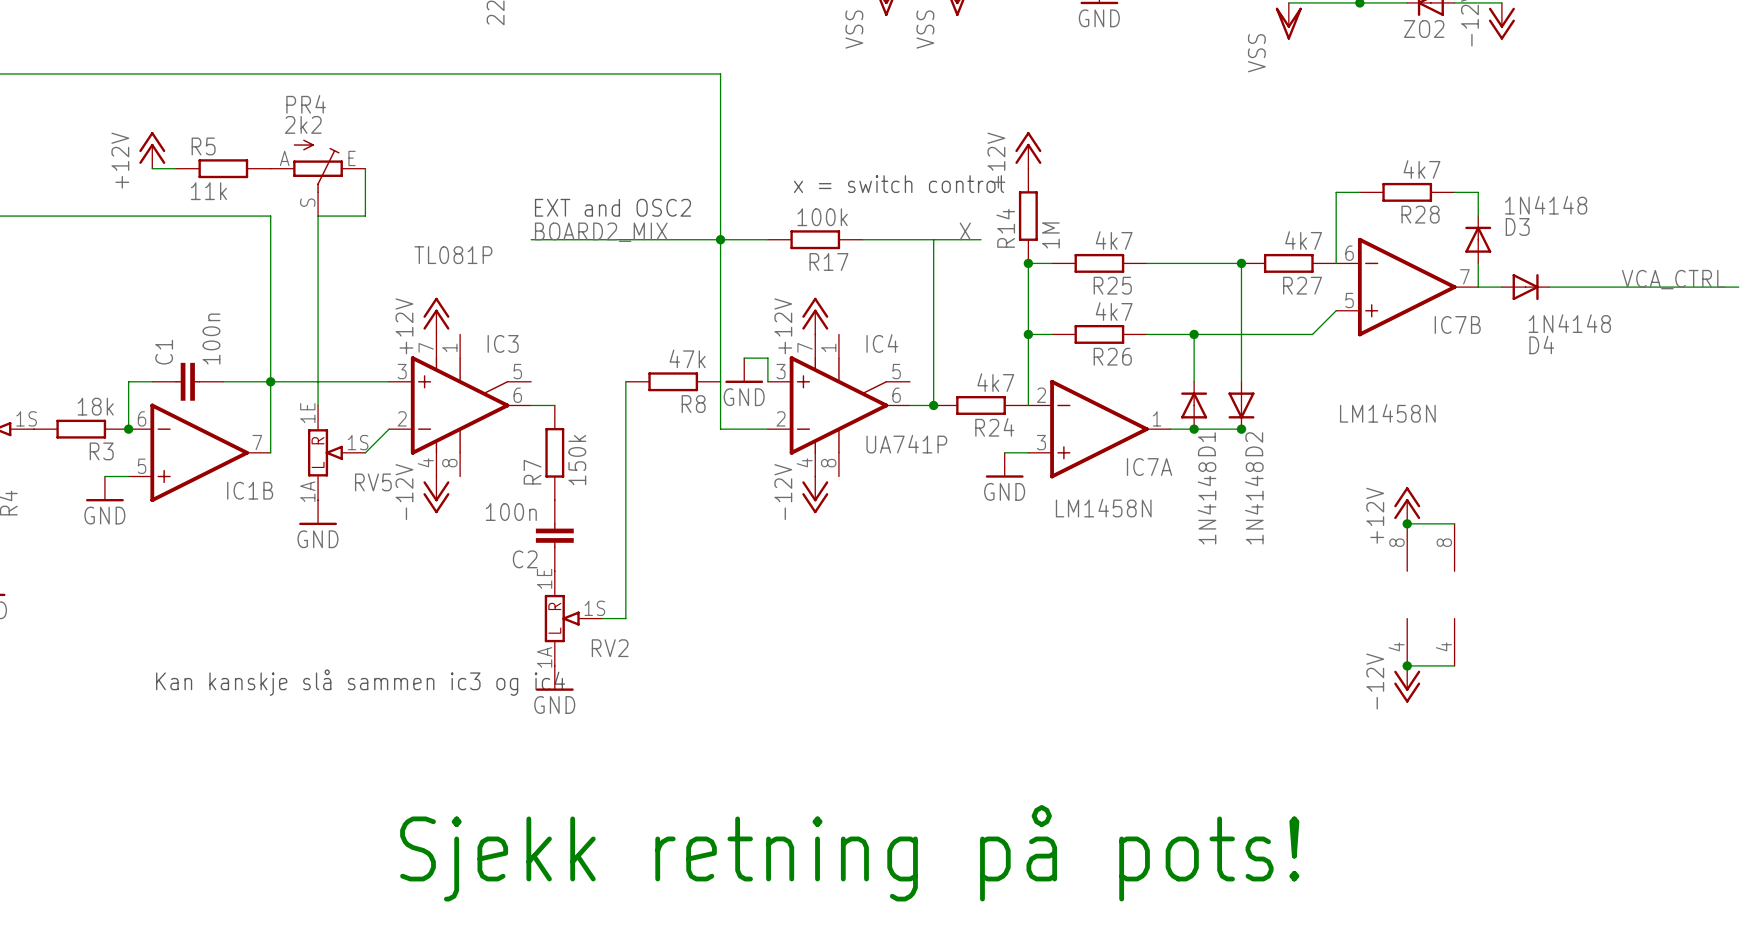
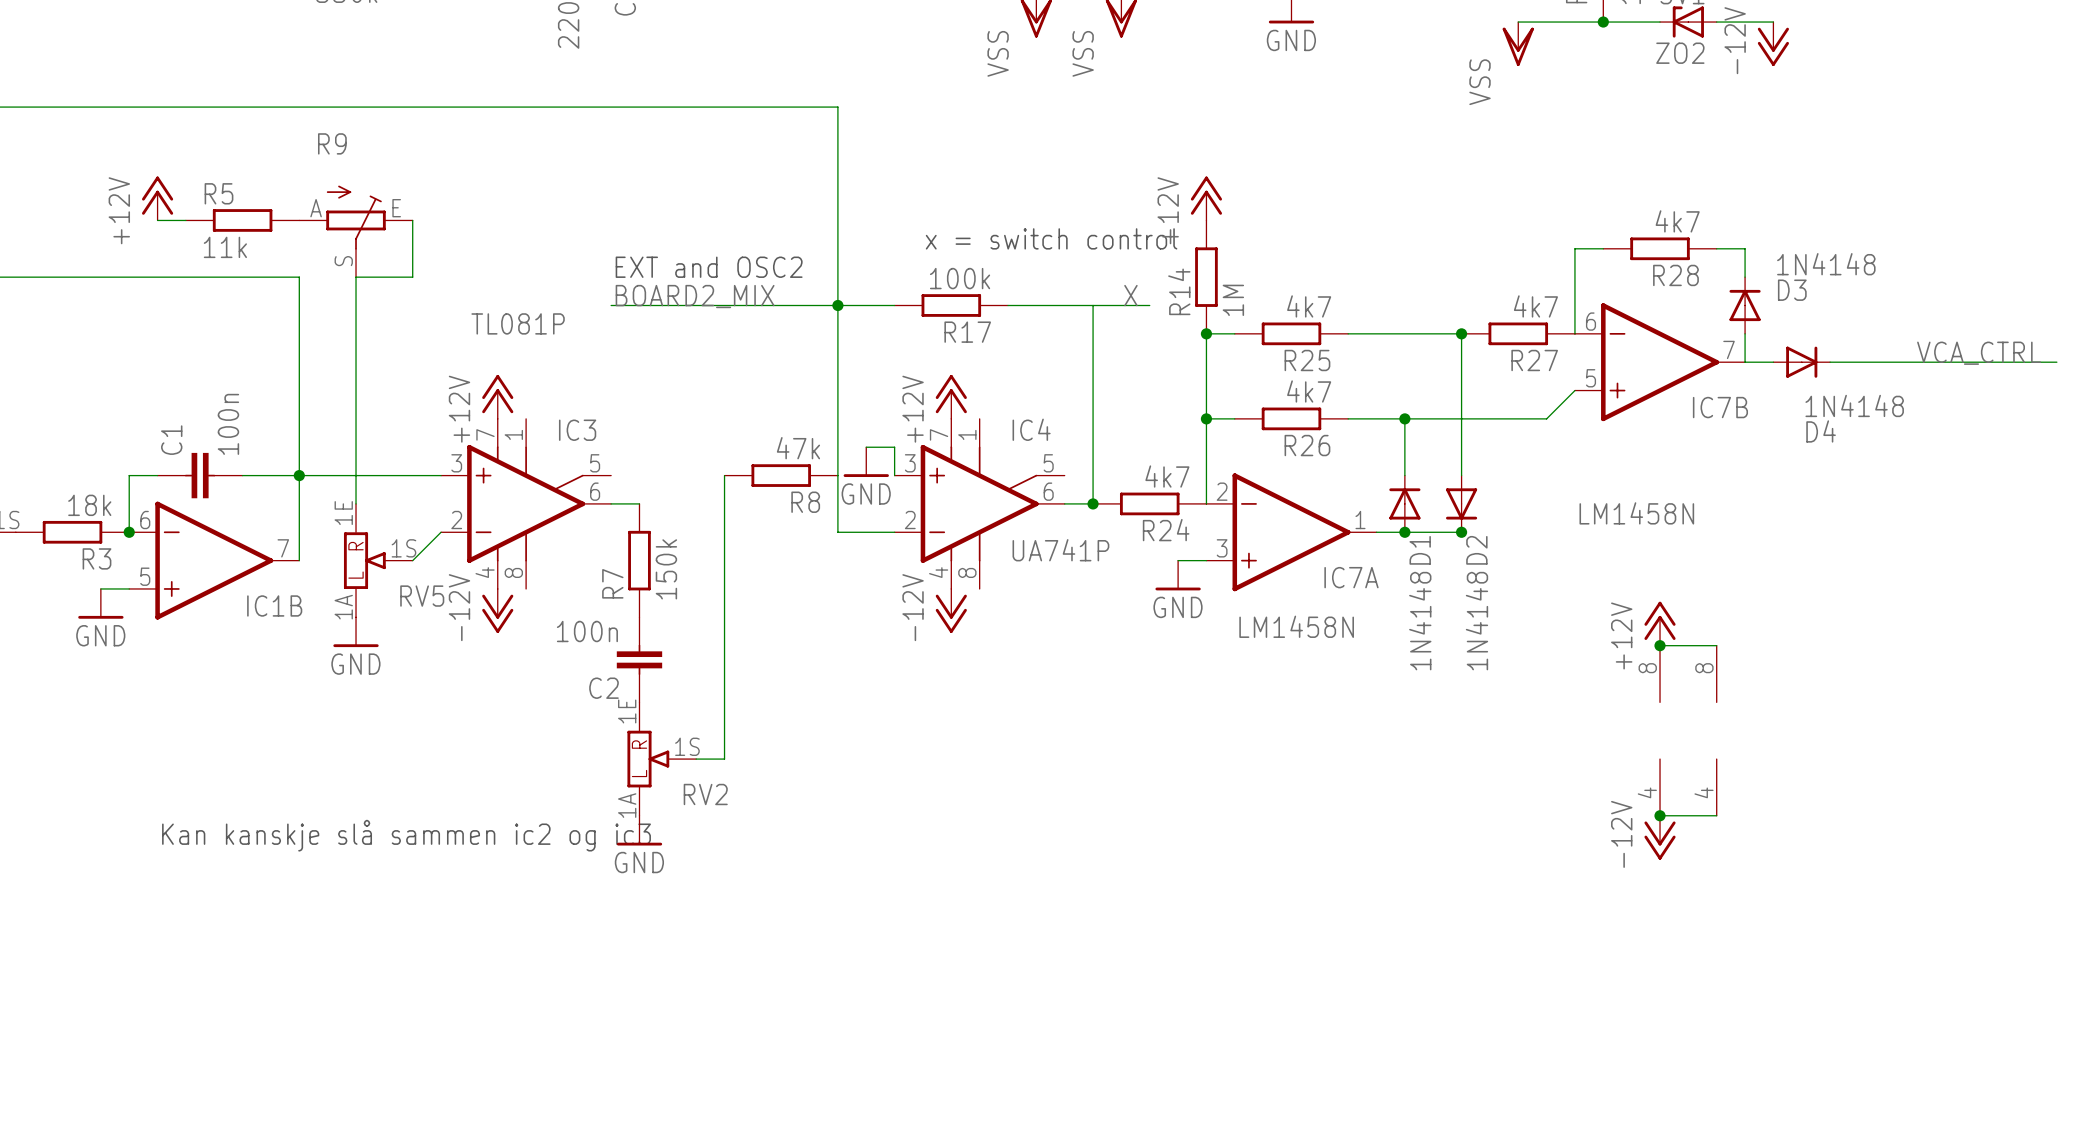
PR4 name: PR4 (306, 104) -> R9 (332, 143)
PR4 value: 2k2 (303, 124) -> none
text: Kan kanskje slå sammen ic3 og ic4 (360, 682) -> Kan kanskje slå sammen ic2 og ic3 (406, 835)
text: Sjekk retning på pots! (849, 853) -> none

